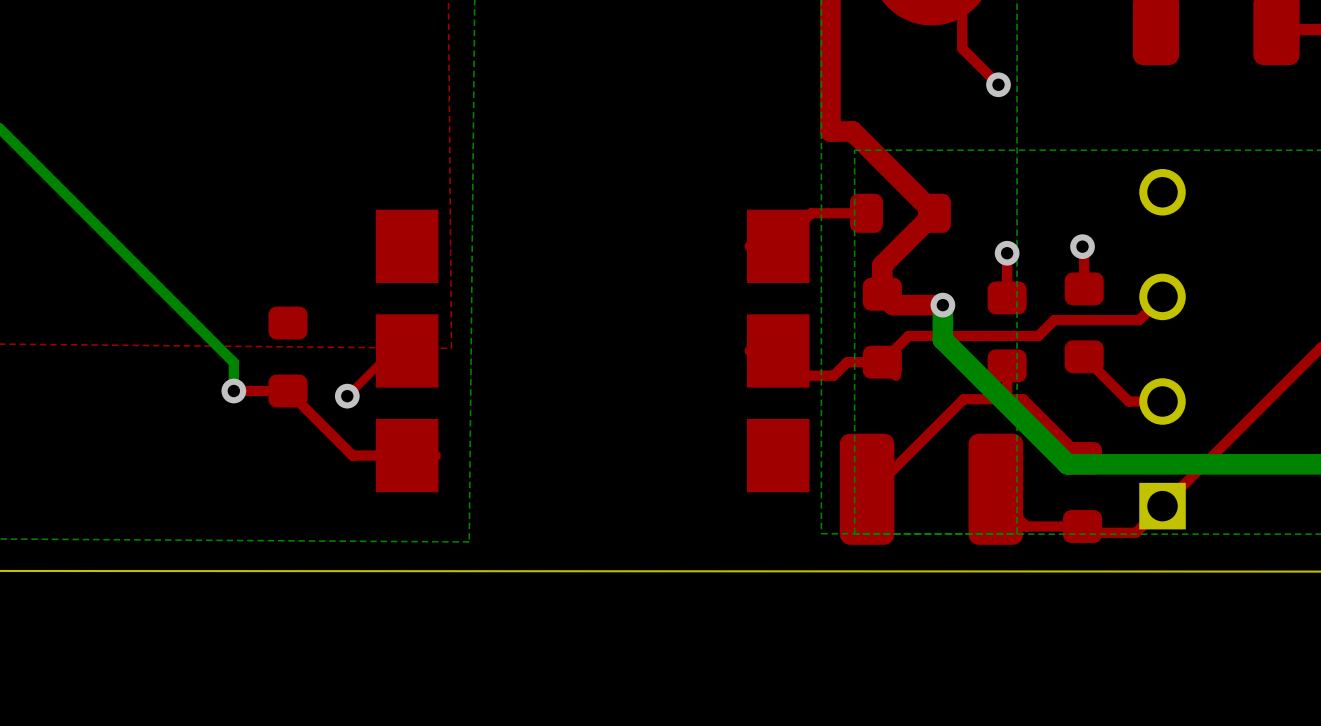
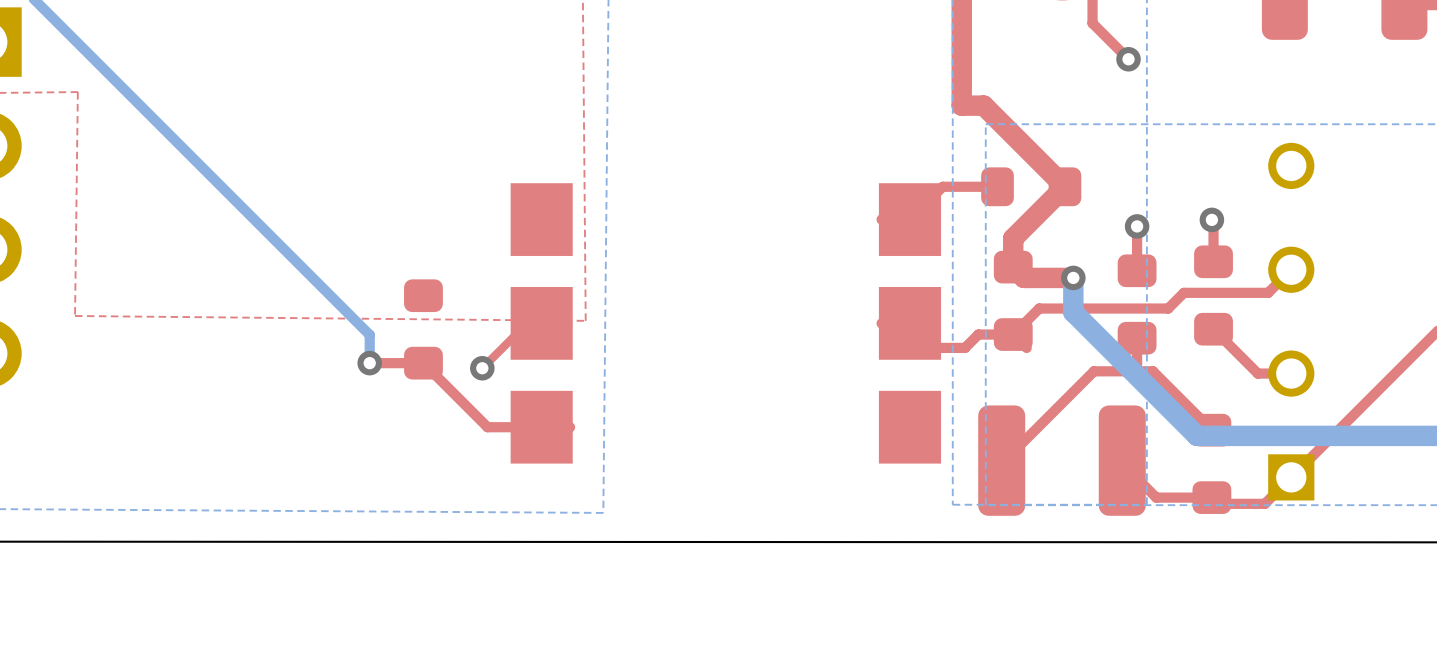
part footprint: [839, 433, 1024, 545] -> [978, 405, 1146, 516]

